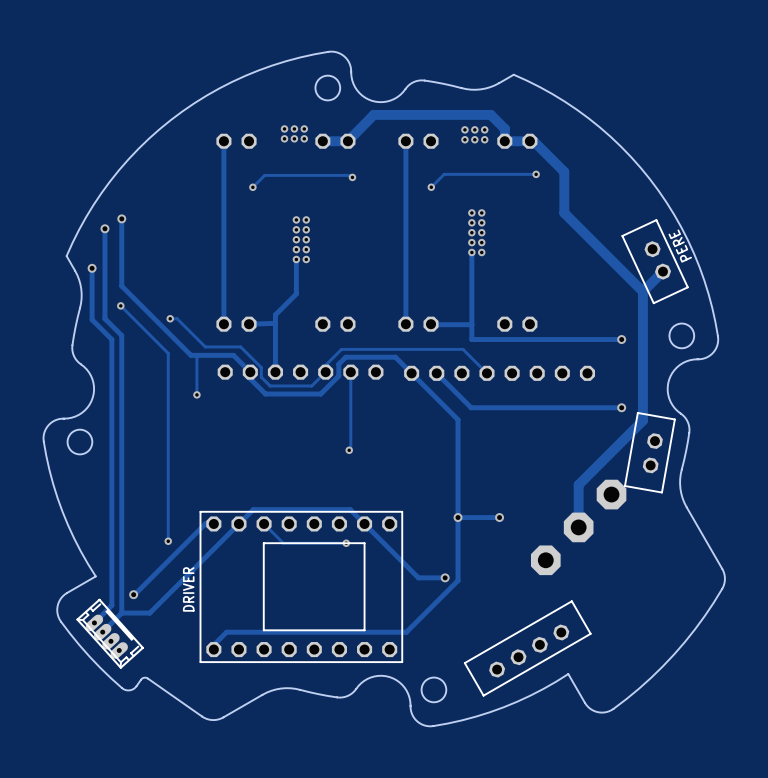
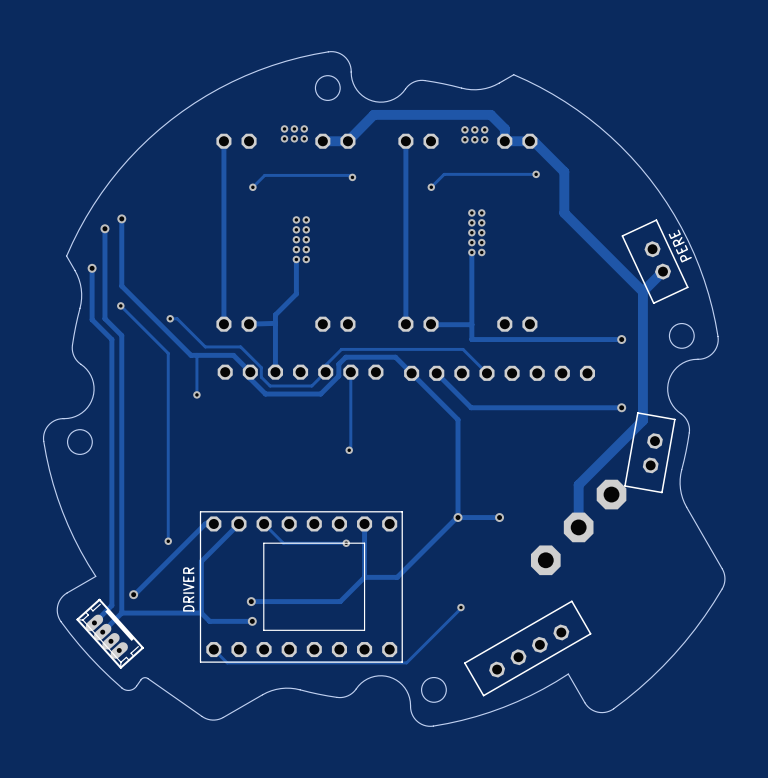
track: none -> (458, 516) (397, 577) (364, 577)
track: (458, 517) (458, 580) (406, 632) (226, 632) (213, 645) (213, 649) -> (460, 607) (406, 662) (227, 662) (213, 649)
track: (238, 523) (253, 509) (350, 509) (418, 577) (445, 577) -> none
track: none -> (364, 523) (364, 577)
track: (201, 561) (149, 613) -> (201, 561) (201, 613)
track: none -> (364, 577) (340, 601) (251, 601)
via: (445, 577) -> none
via: none -> (251, 601)
via: none -> (460, 607)
track: none -> (201, 613) (149, 613)
track: none -> (201, 613) (209, 621) (252, 621)
via: none -> (252, 621)

